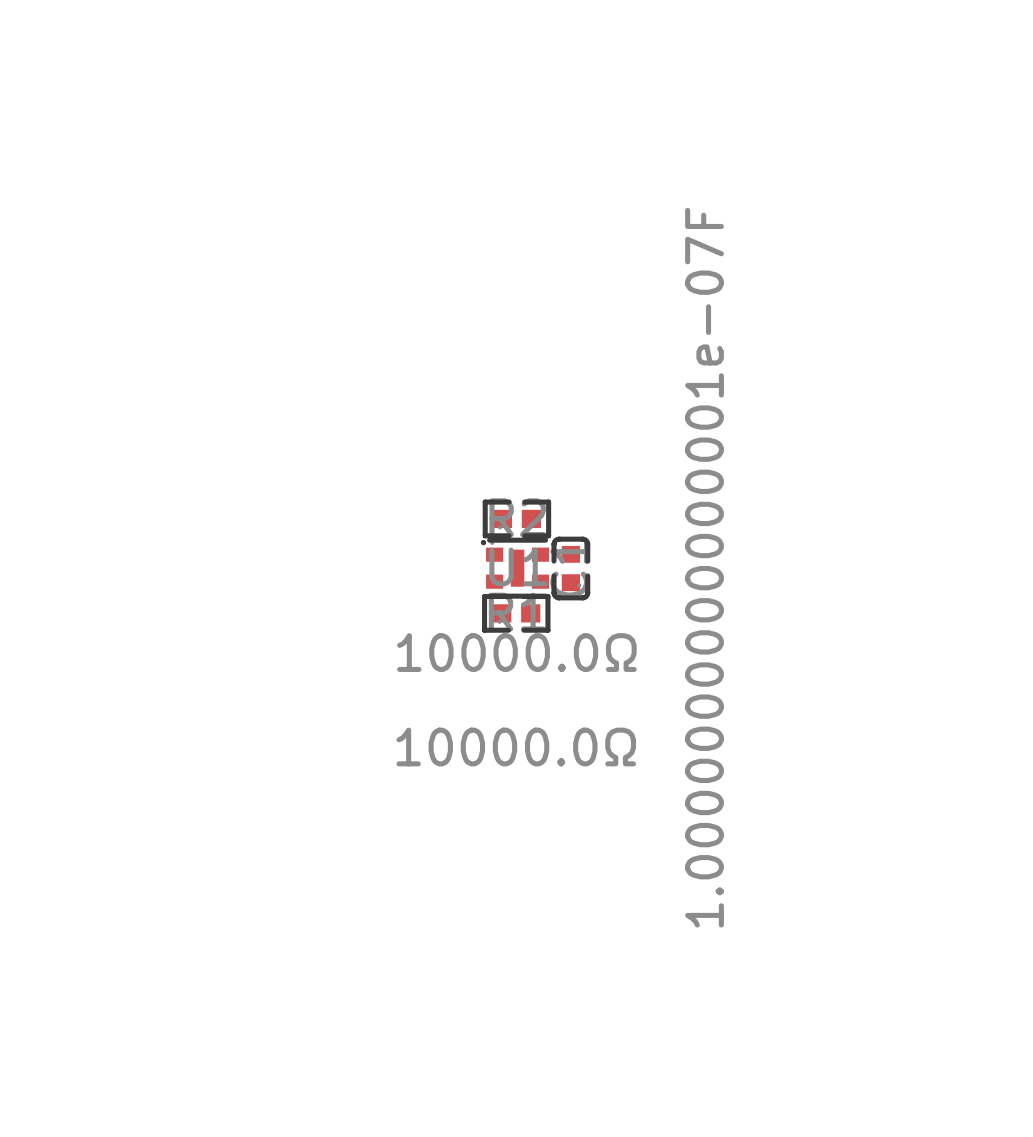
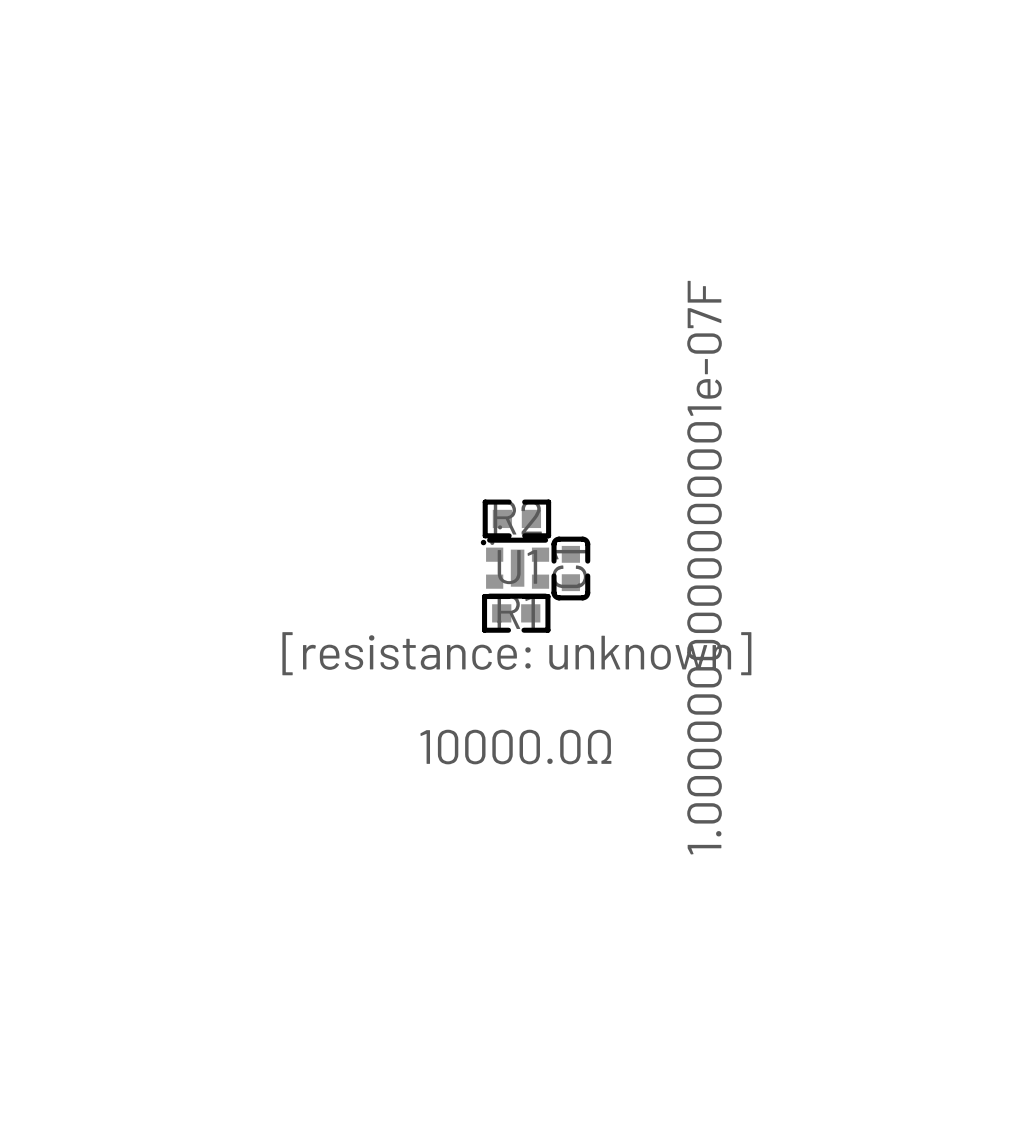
part value: 10000.0Ω (516, 652) -> [resistance: unknown] (516, 653)

